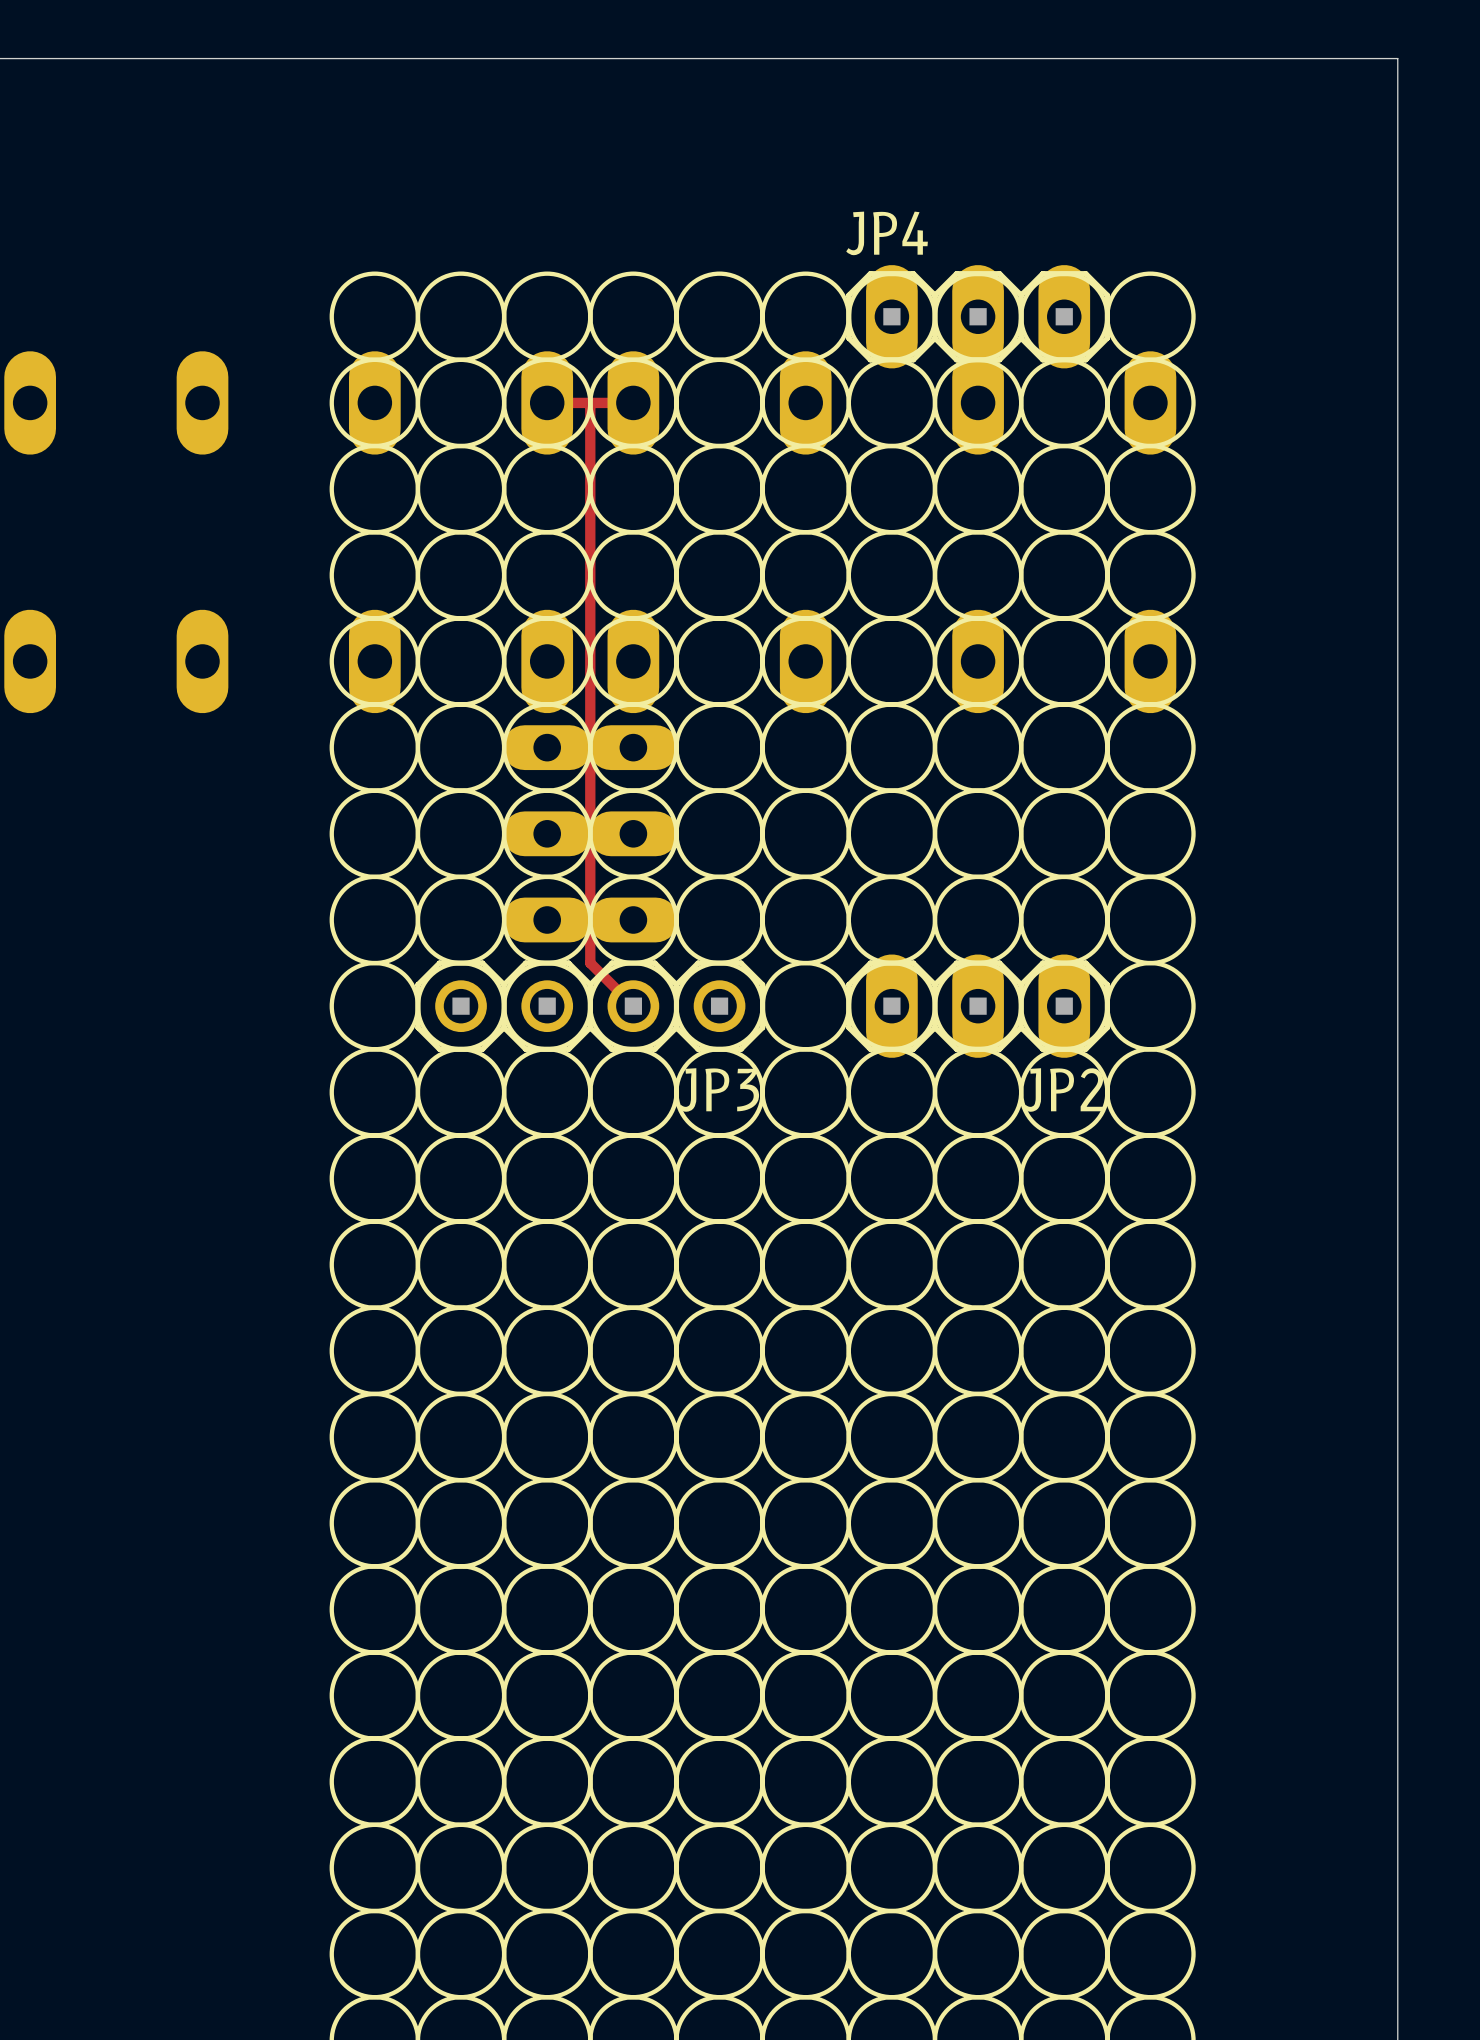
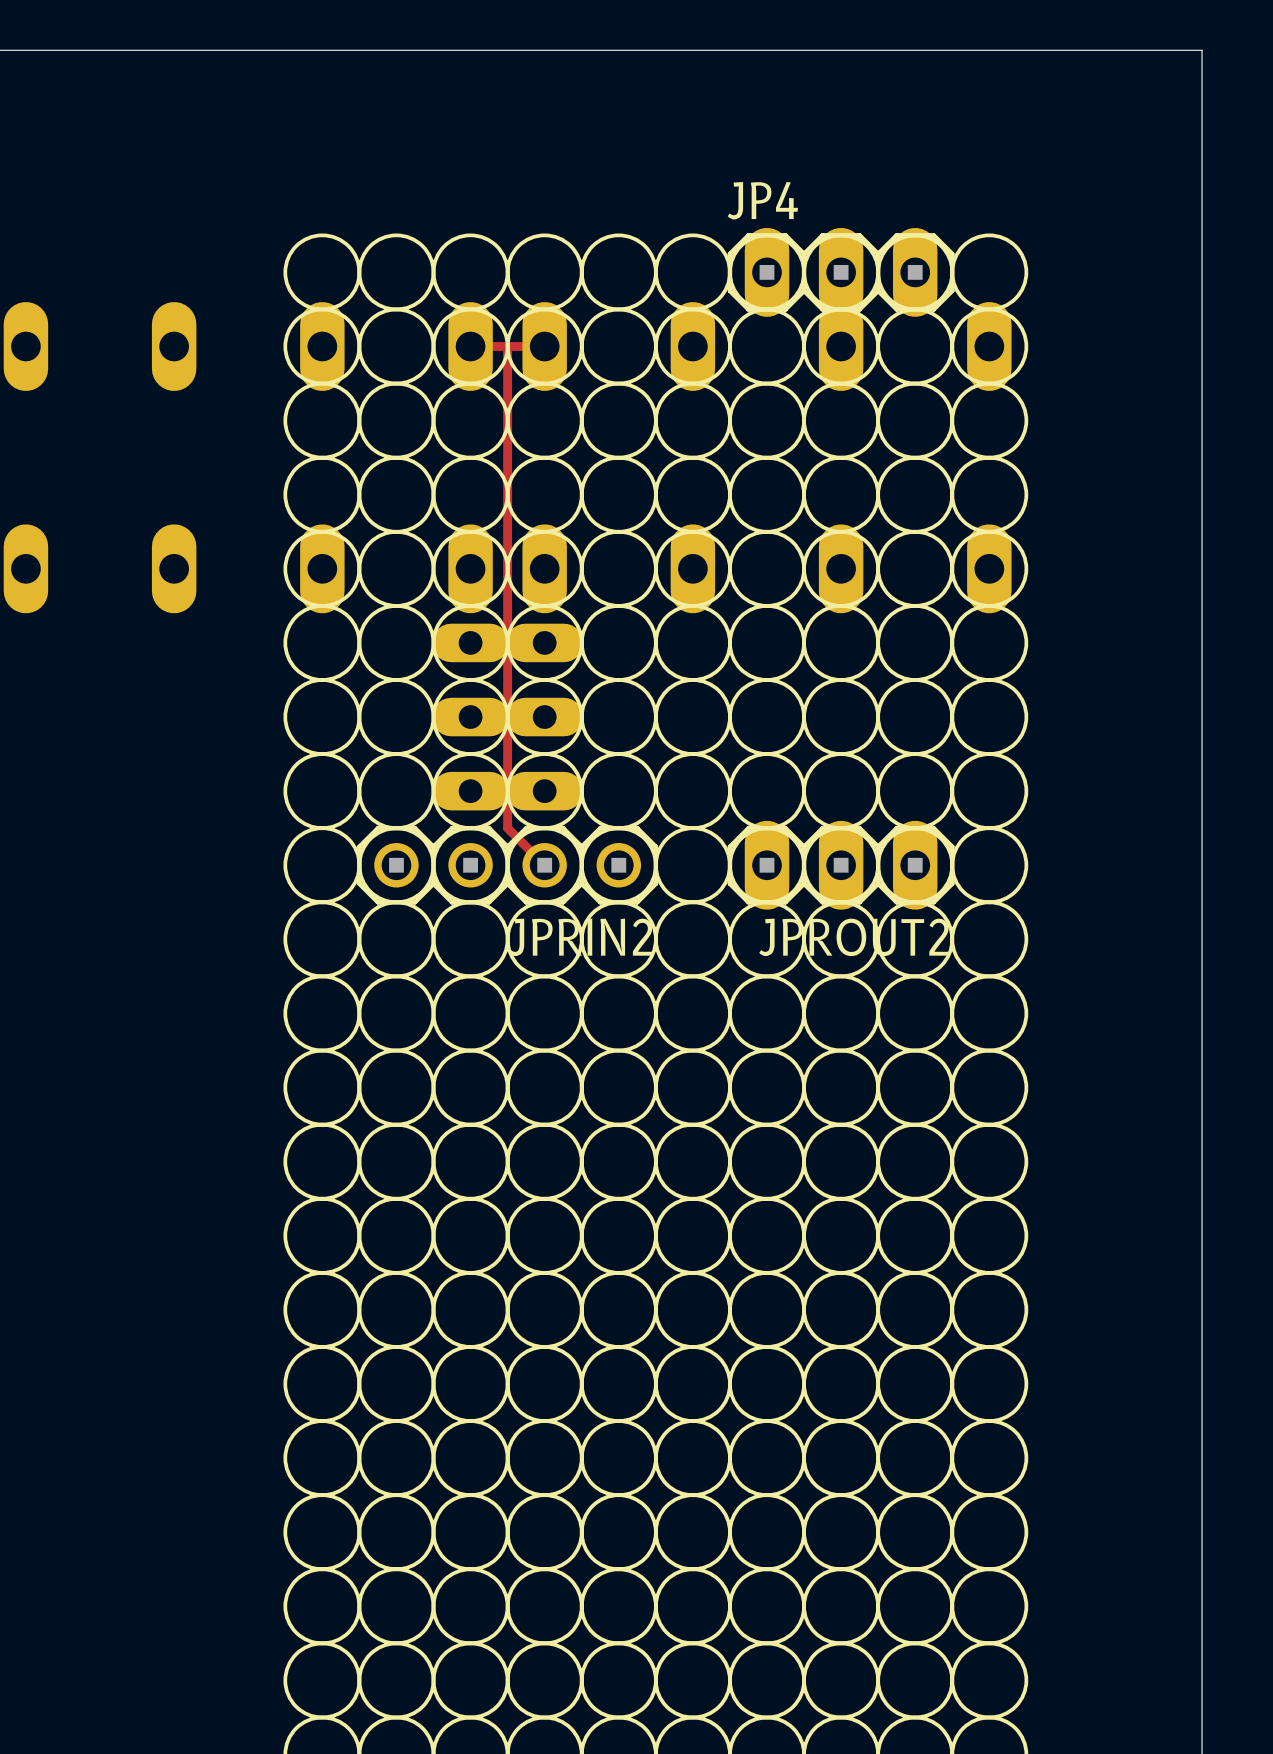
JP3 name: JP3 (718, 1089) -> JPRIN2 (580, 937)
JP2 name: JP2 (1063, 1089) -> JPROUT2 (854, 937)

